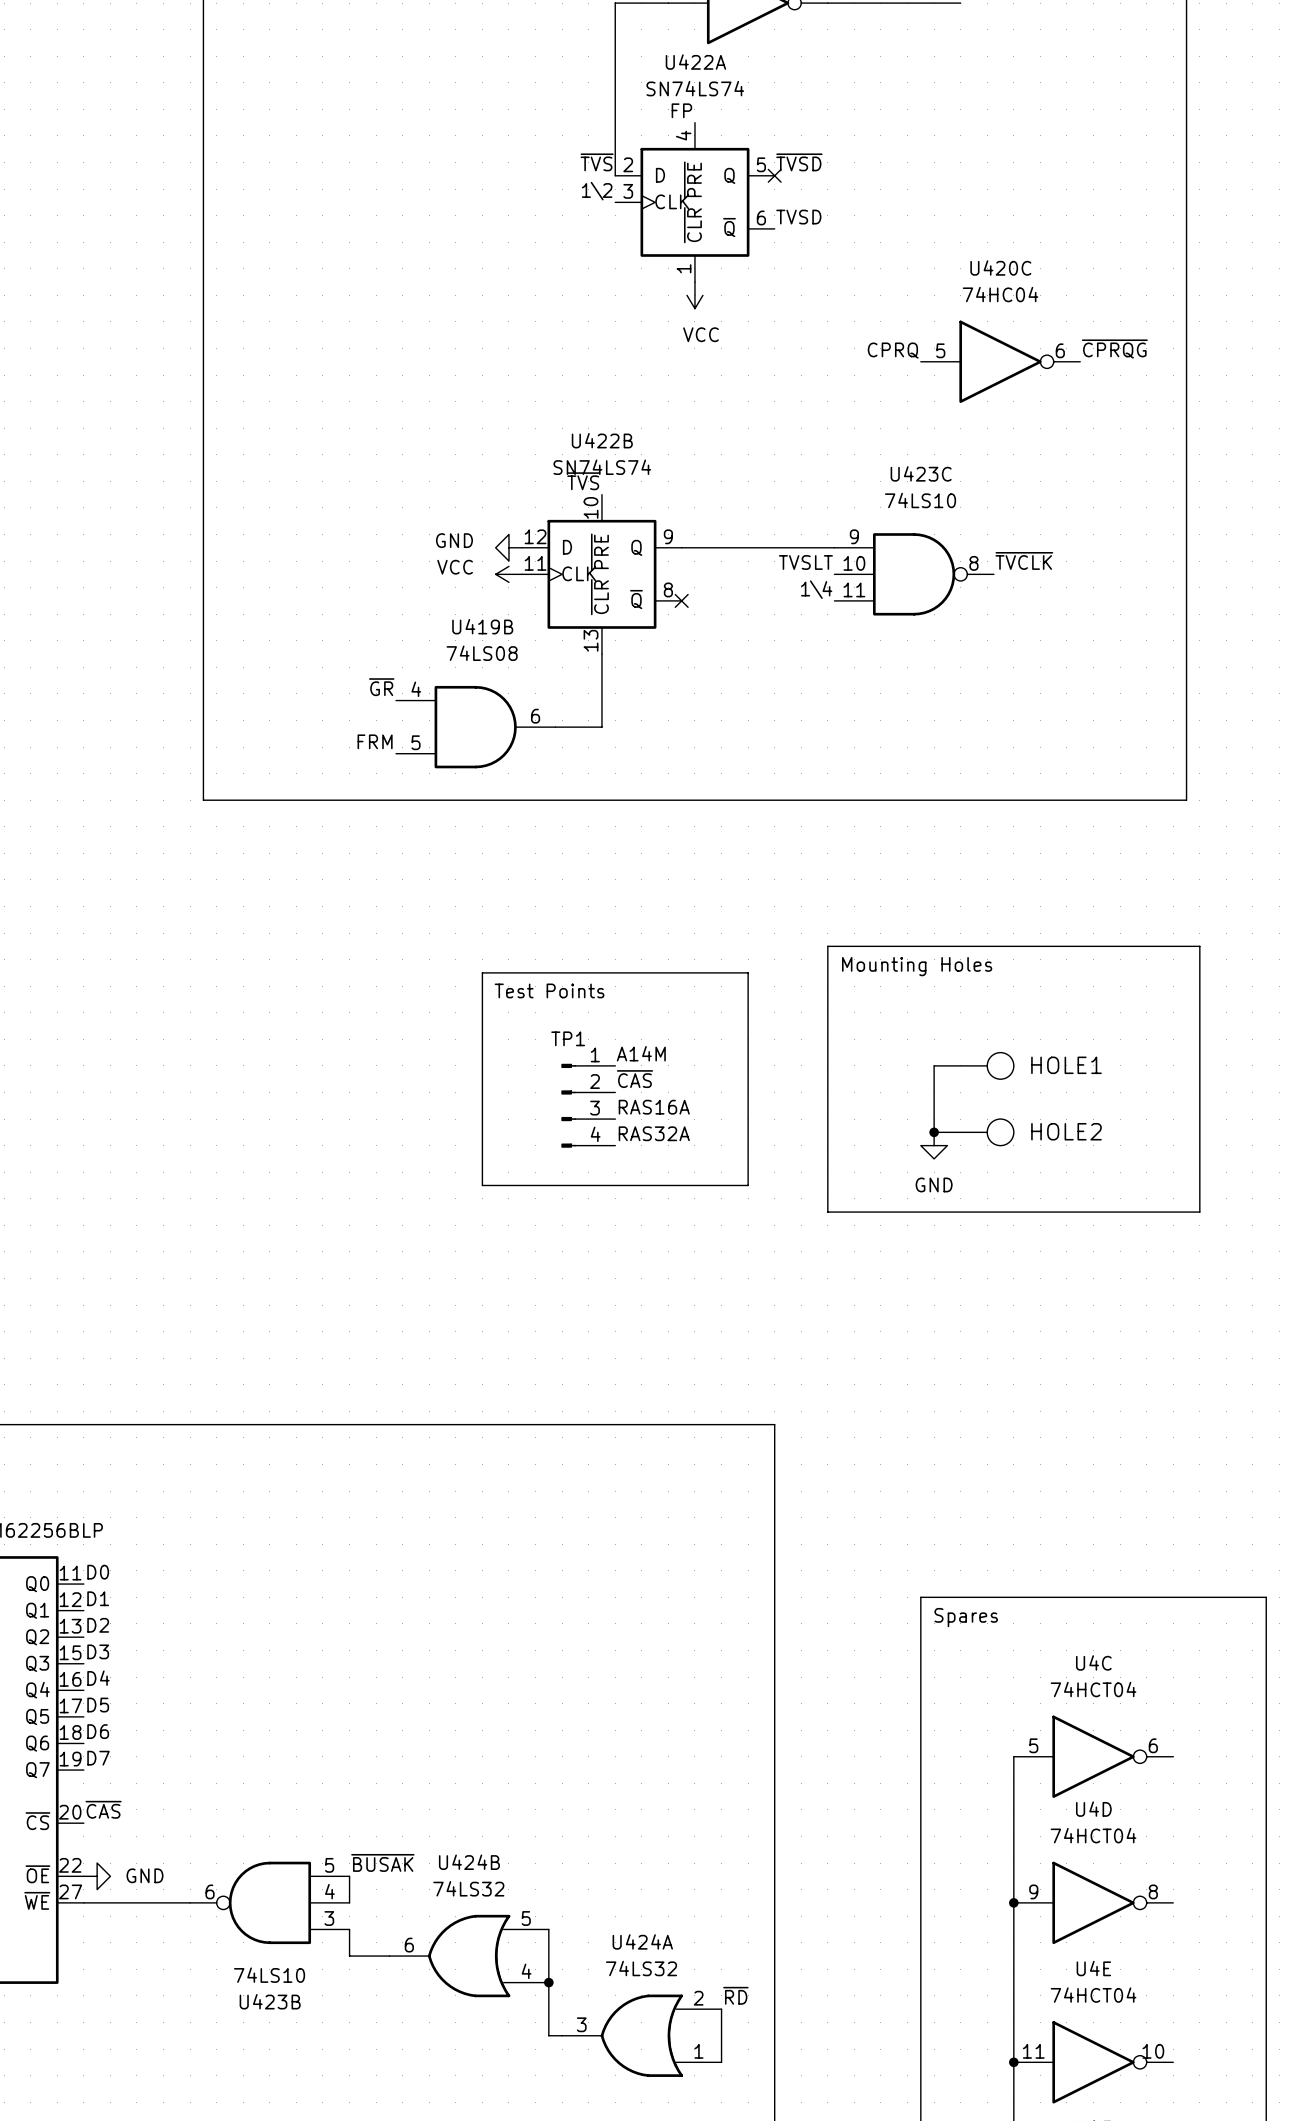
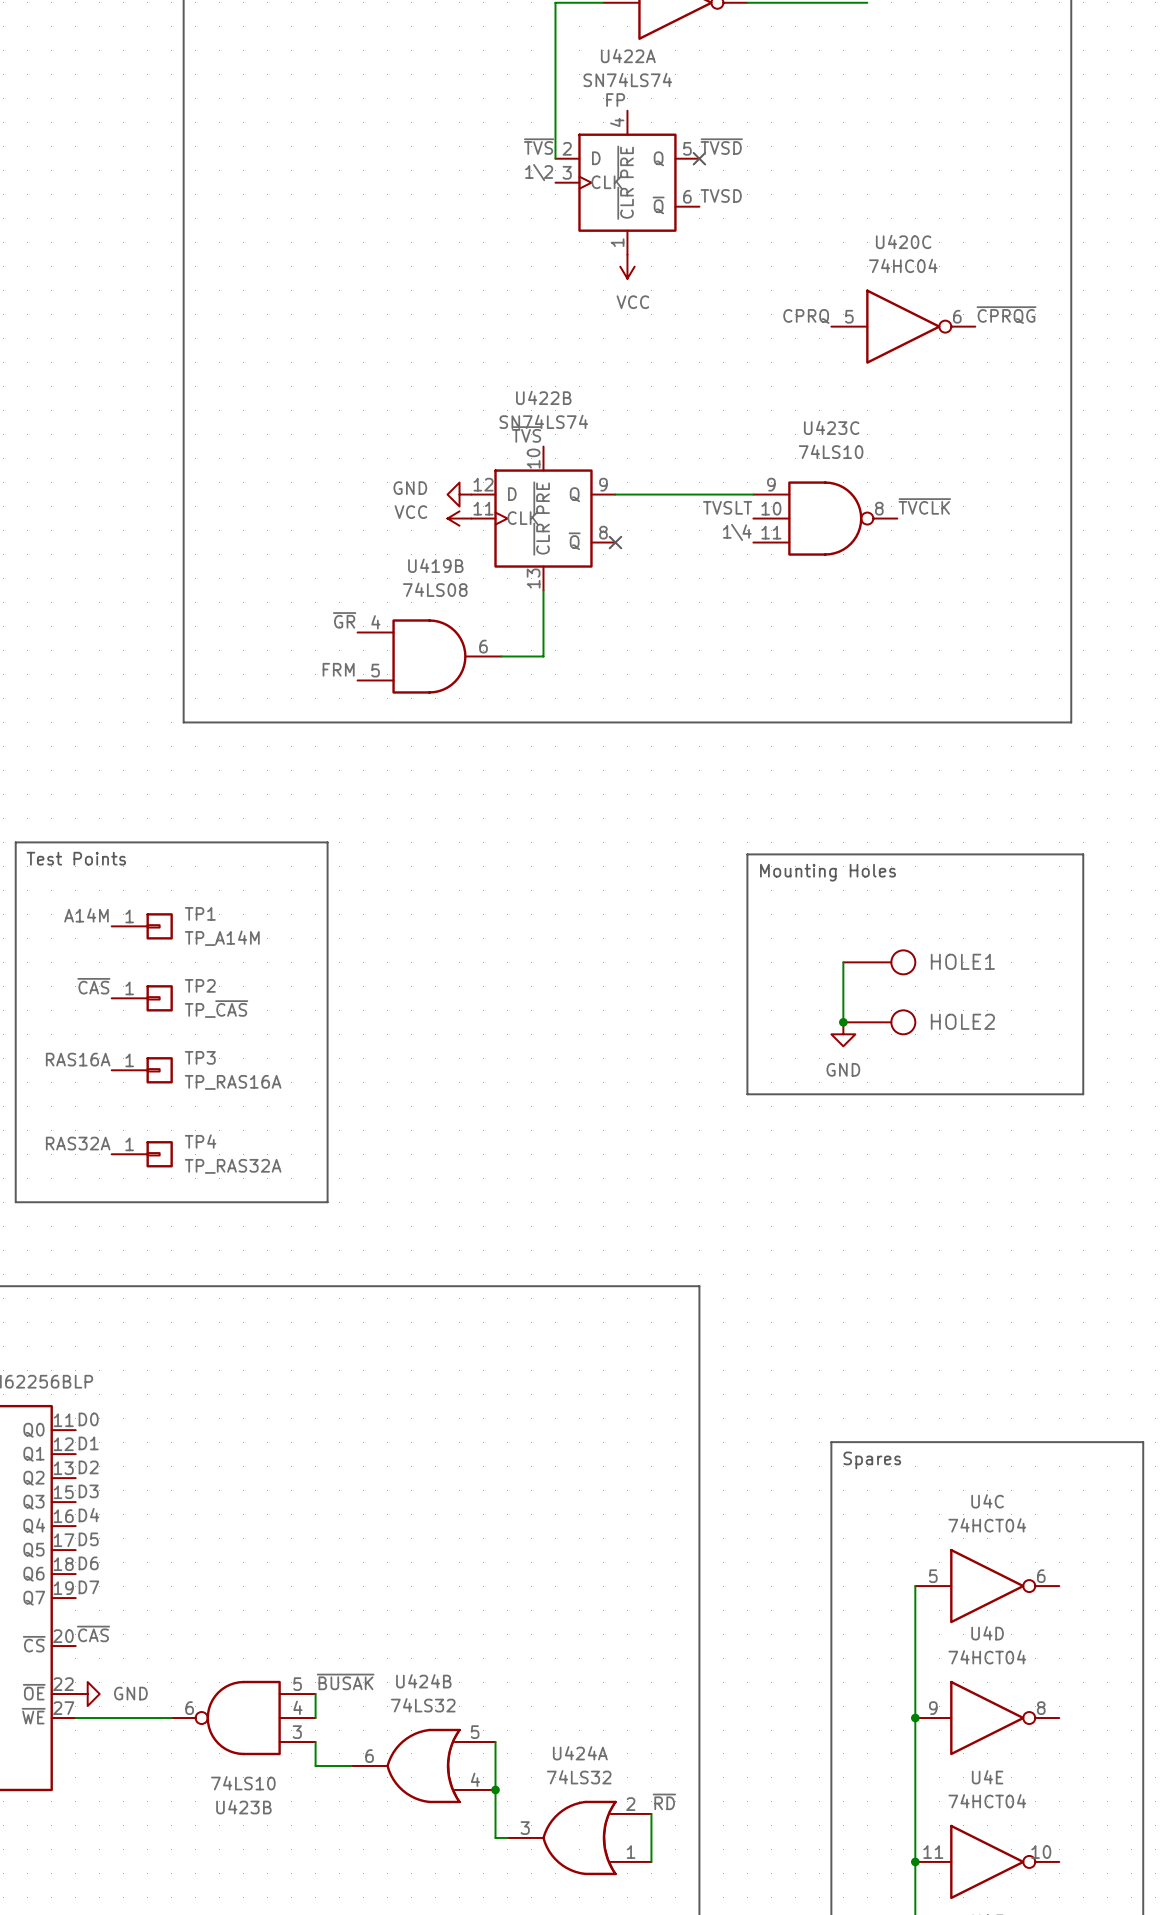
line: none -> (15, 842) (327, 842) (327, 1202) (15, 1202) (15, 842)
text: none -> Test Points (76, 858)
line: (482, 972) (748, 972) (748, 1185) (482, 1185) (482, 972) -> none
text: Test Points (549, 990) -> none
label: none -> A14M (86, 915)
TP1 name position: TP1 (568, 1038) -> TP1 (200, 913)
TP1 value: none -> TP_A14M (222, 938)
label: A14M (641, 1053) -> none
TP1 symbol: [561, 1063, 616, 1148] -> [111, 913, 173, 940]
label: ~{CAS} (634, 1079) -> none
label: none -> ~{CAS} (93, 986)
TP2: none -> TP_~{CAS} (142, 998)
label: RAS16A (654, 1107) -> none
label: RAS32A (654, 1133) -> none
label: none -> RAS16A (78, 1059)
TP3: none -> TP_RAS16A (142, 1070)
label: none -> RAS32A (78, 1143)
TP4: none -> TP_RAS32A (142, 1154)

